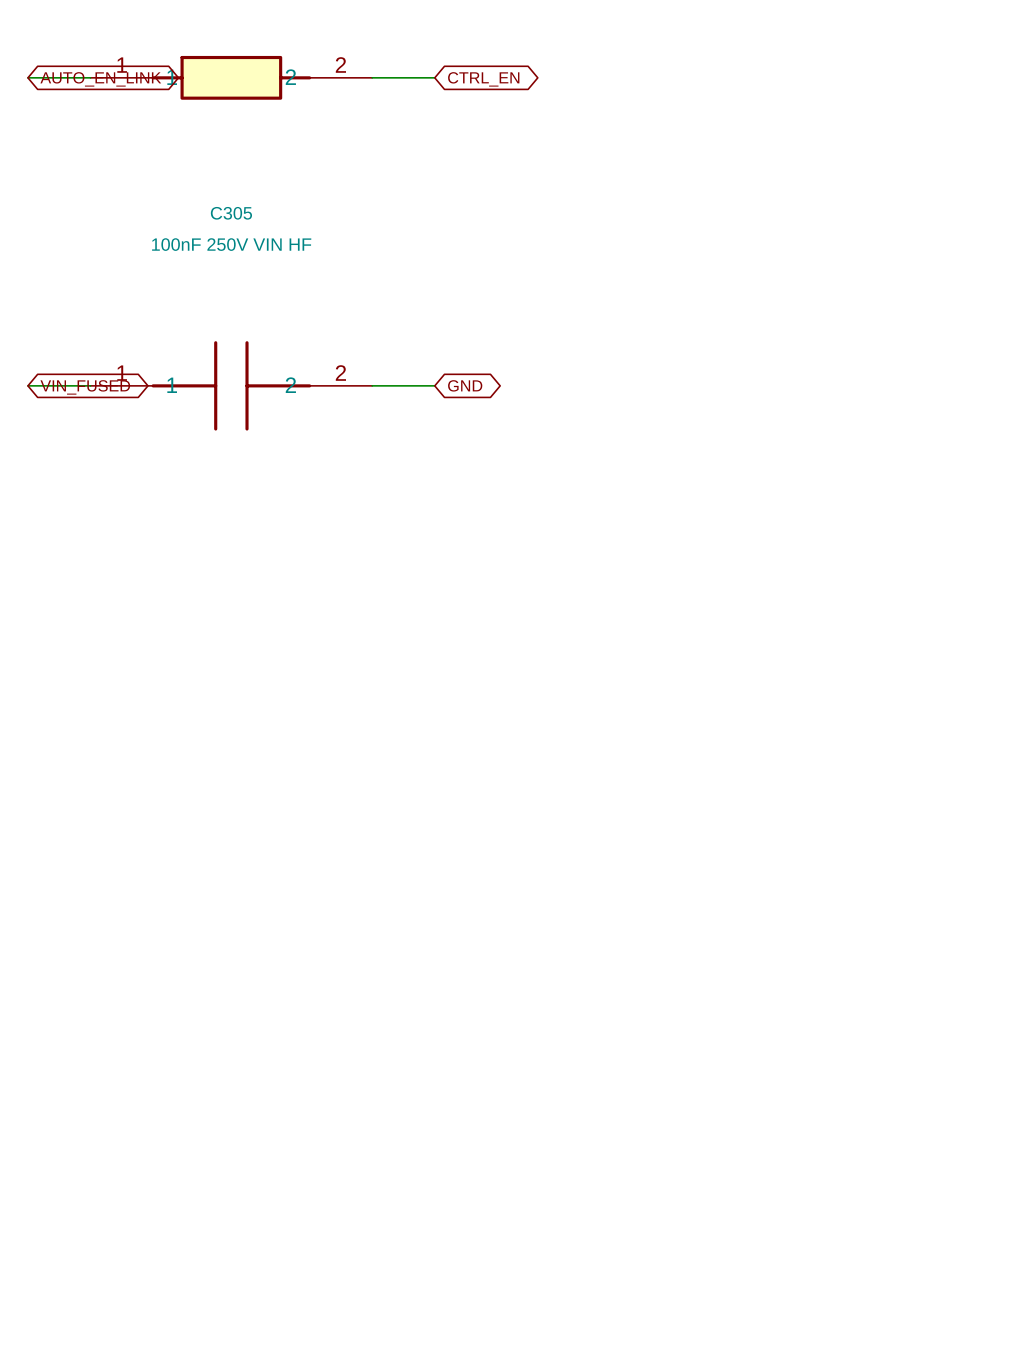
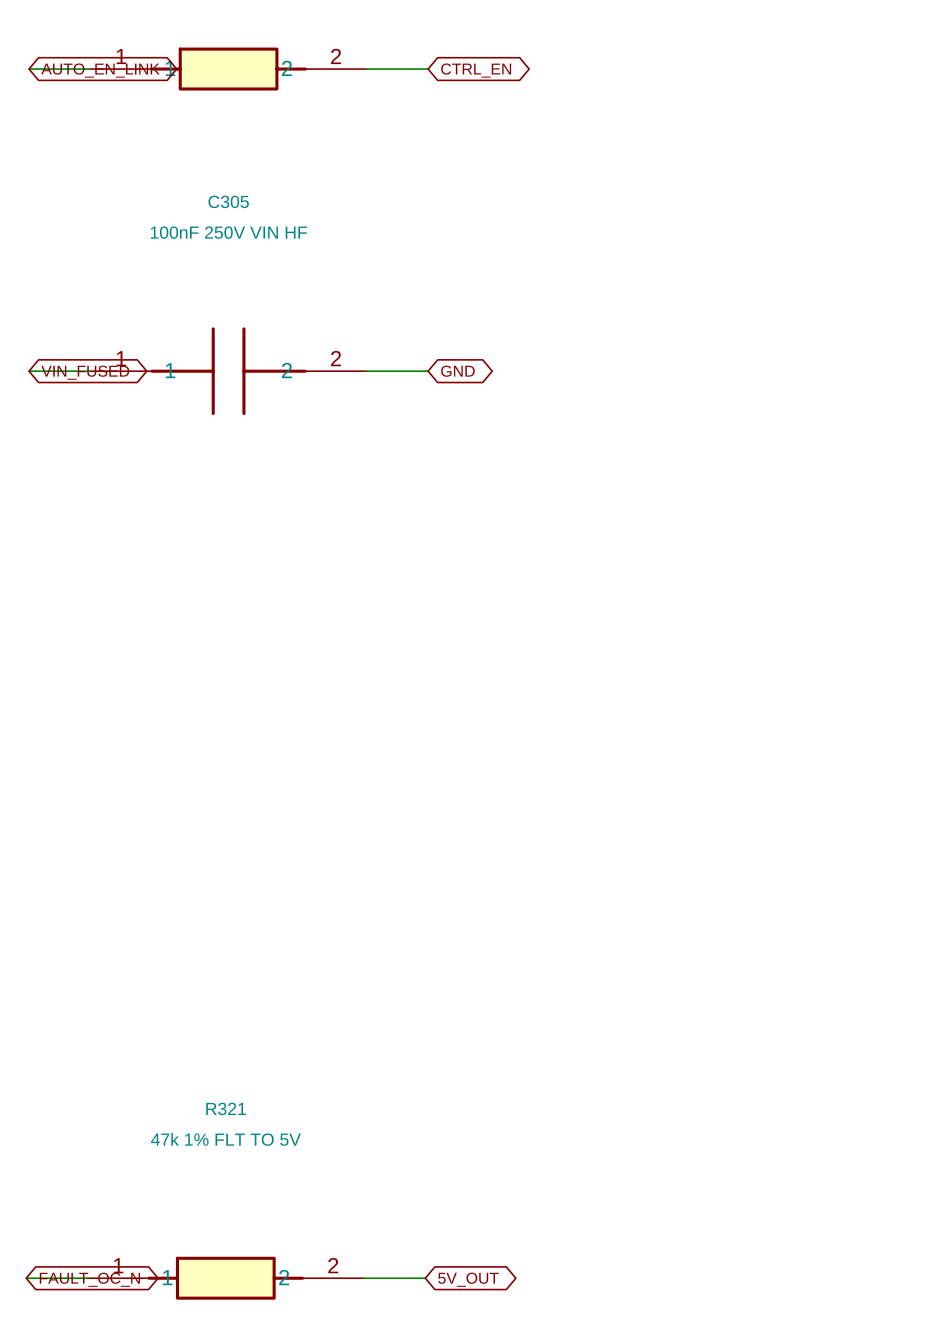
wire: none -> (26, 1278) (87, 1278)
R321: none -> 47k 1% FLT TO 5V (225, 1278)
wire: none -> (363, 1278) (425, 1278)
global label: none -> FAULT_OC_N (89, 1279)
global label: none -> 5V_OUT (468, 1279)

